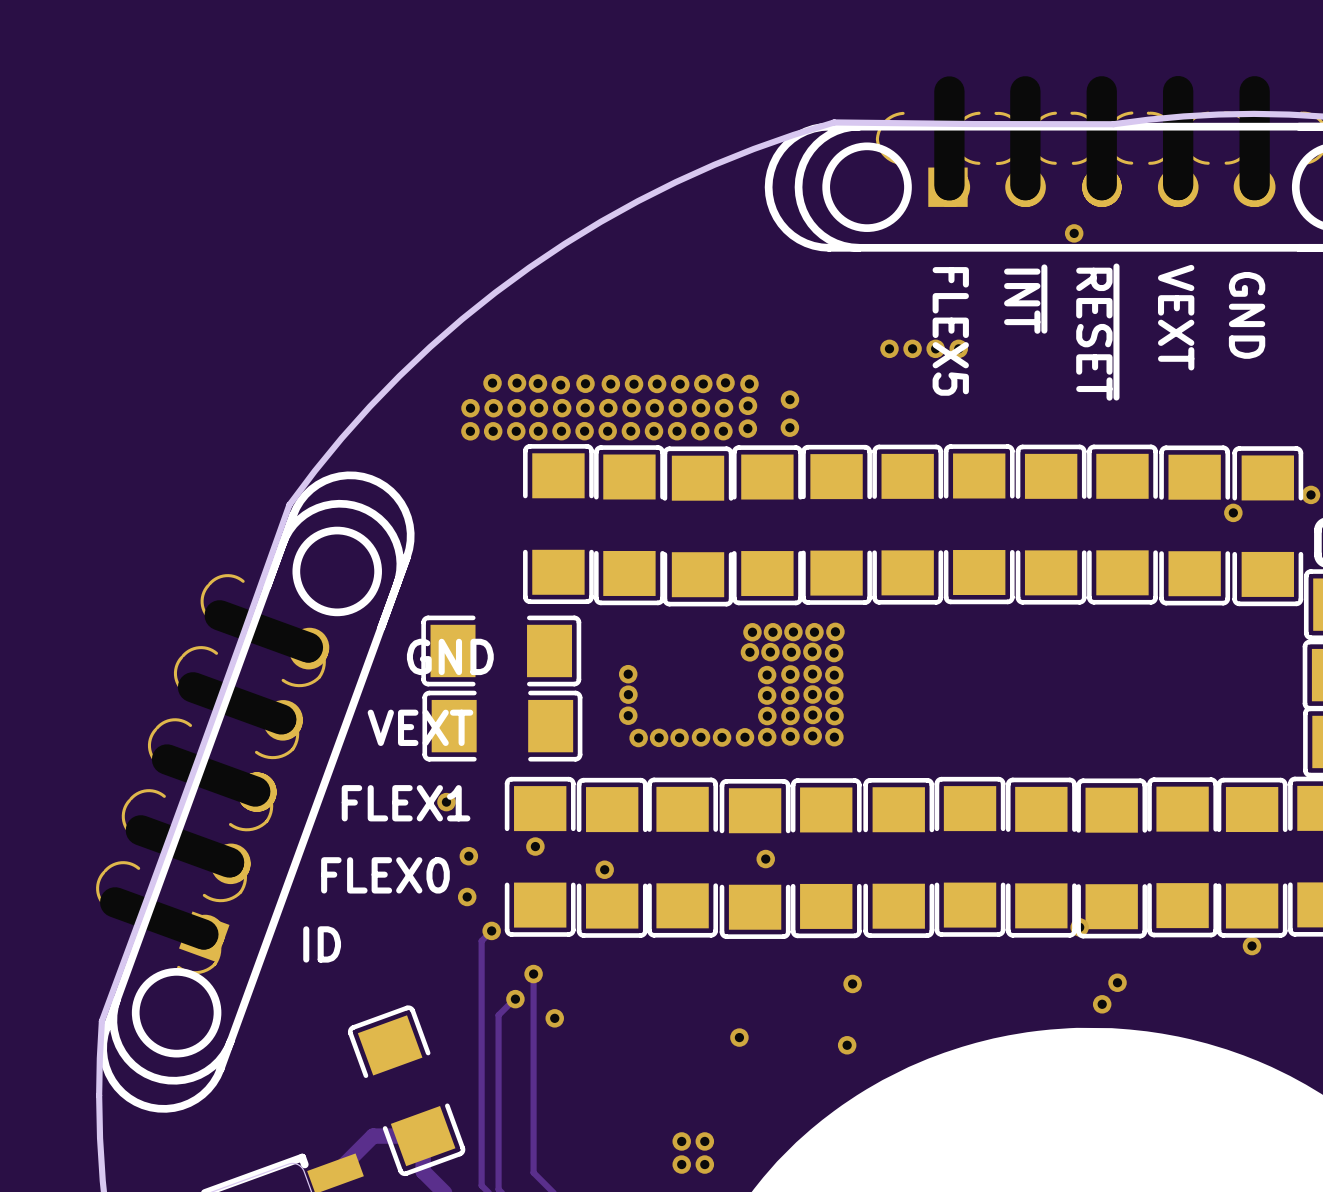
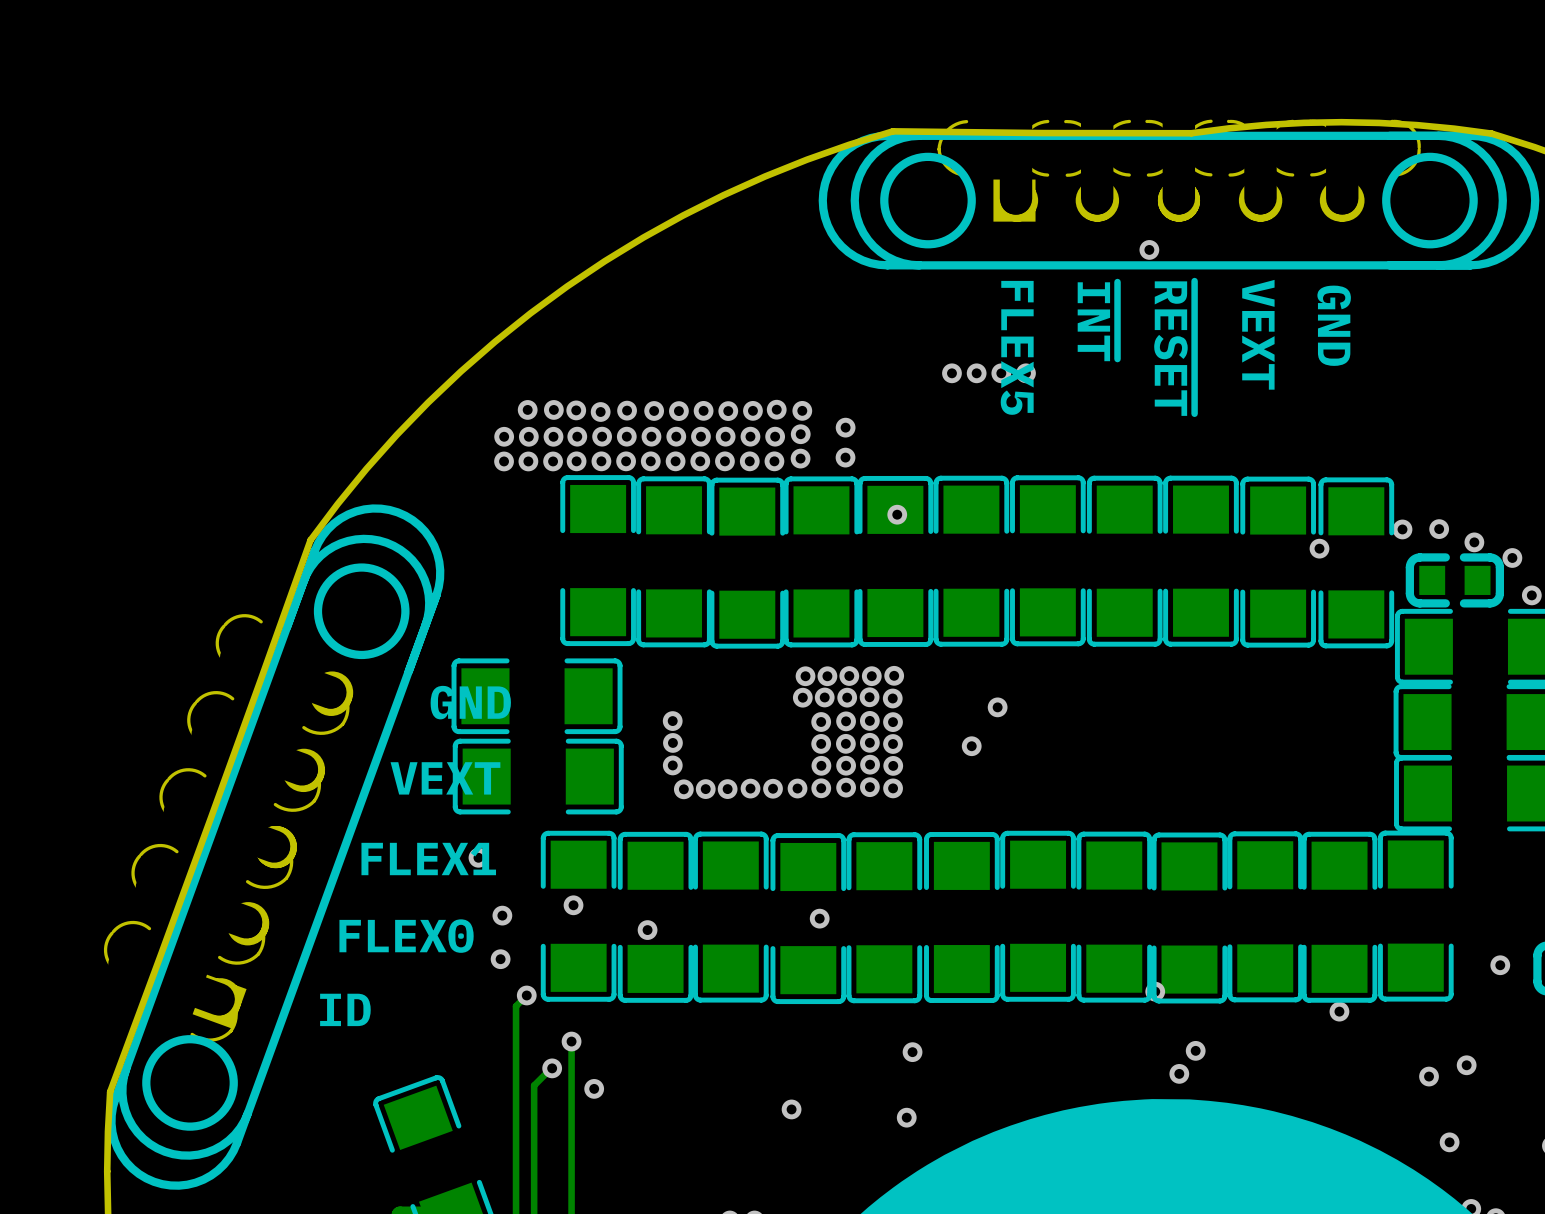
via: none -> (897, 514)
via: none -> (997, 707)
via: none -> (971, 746)

